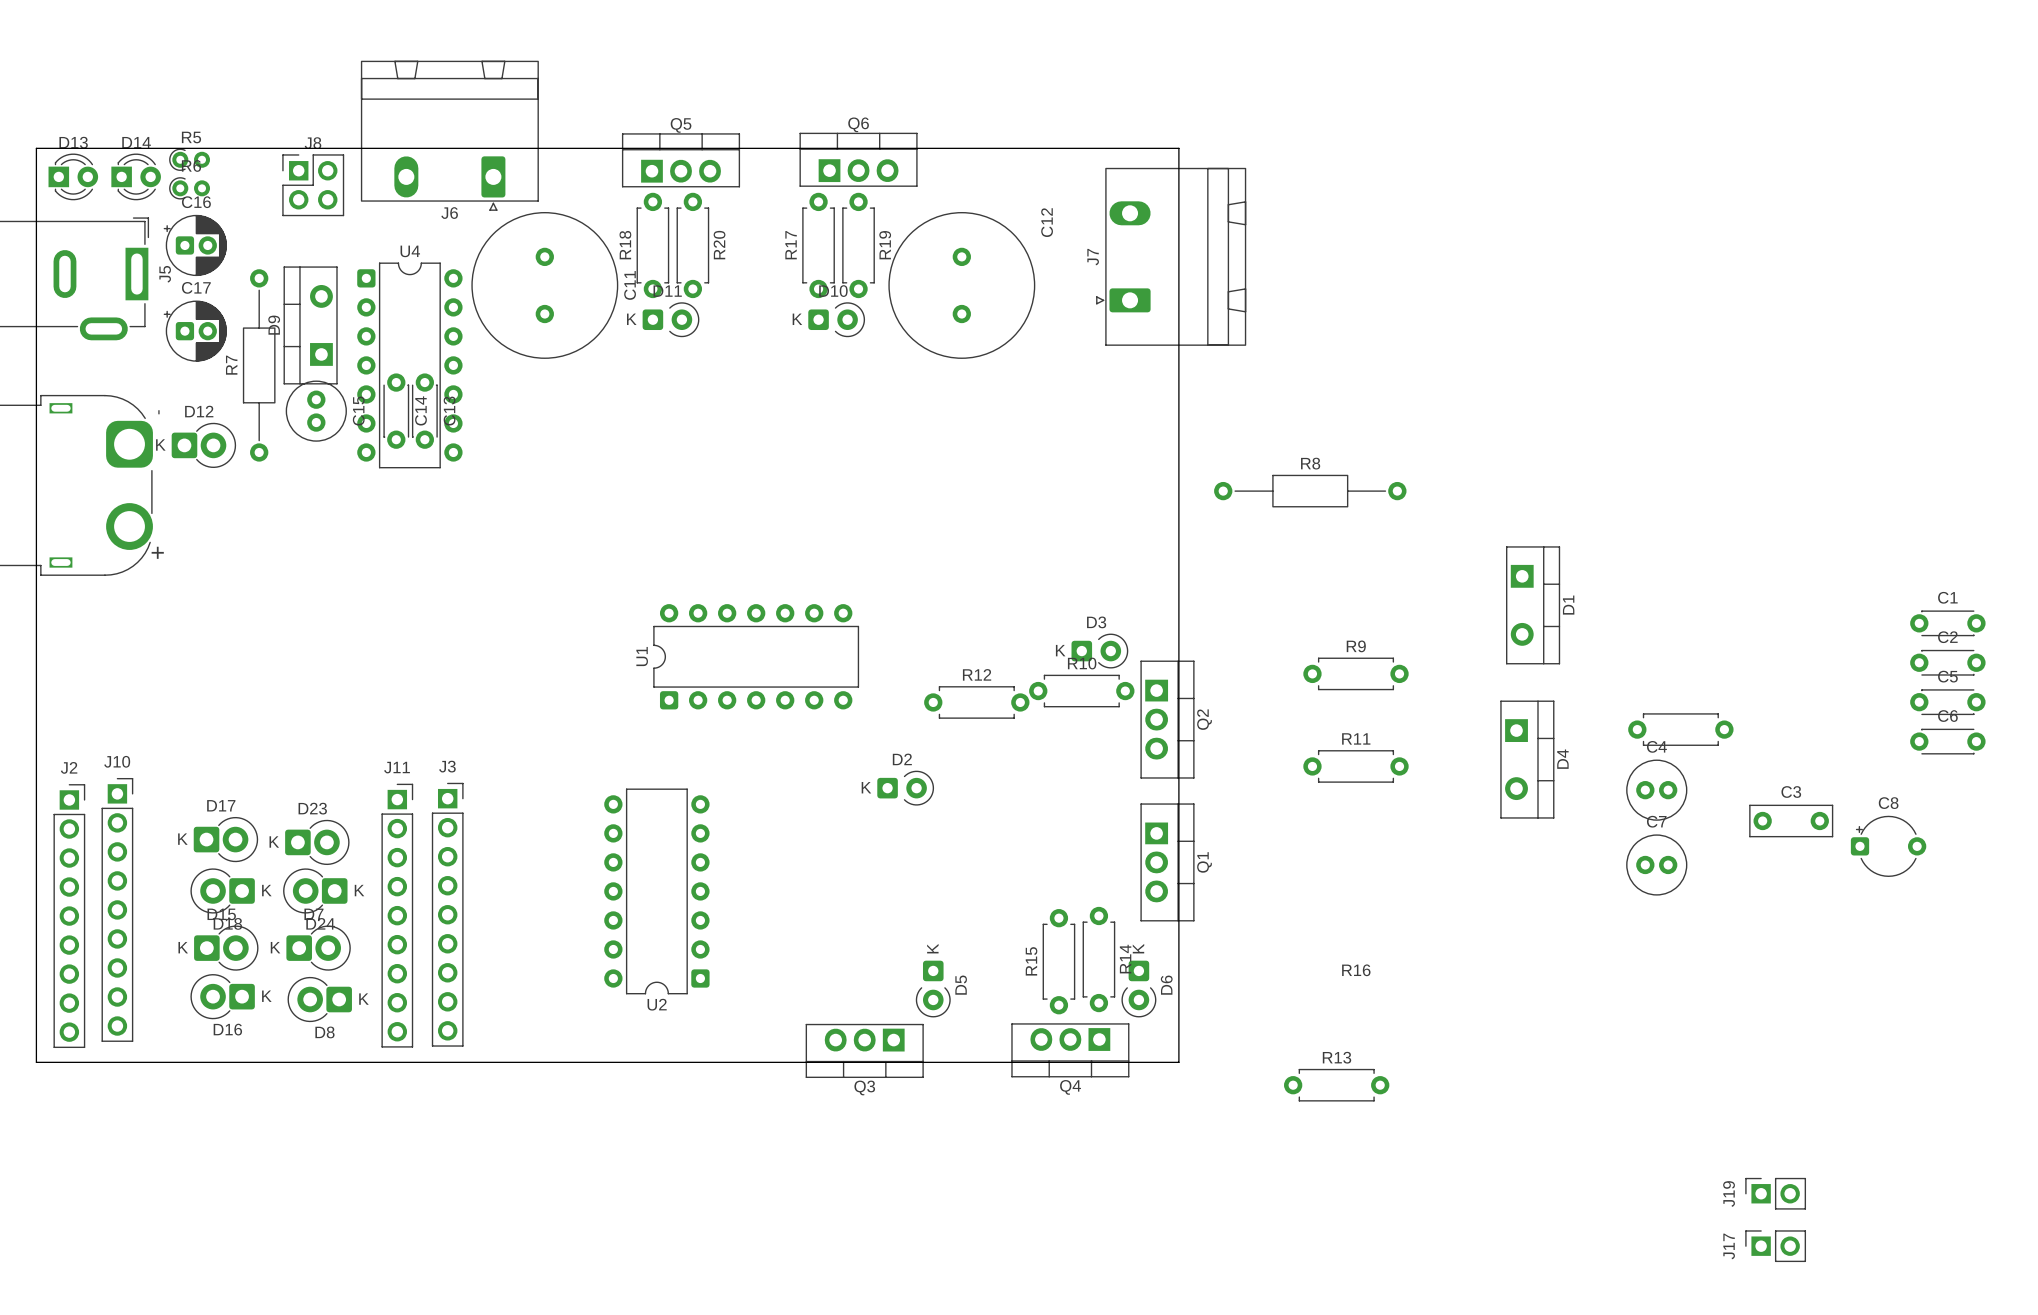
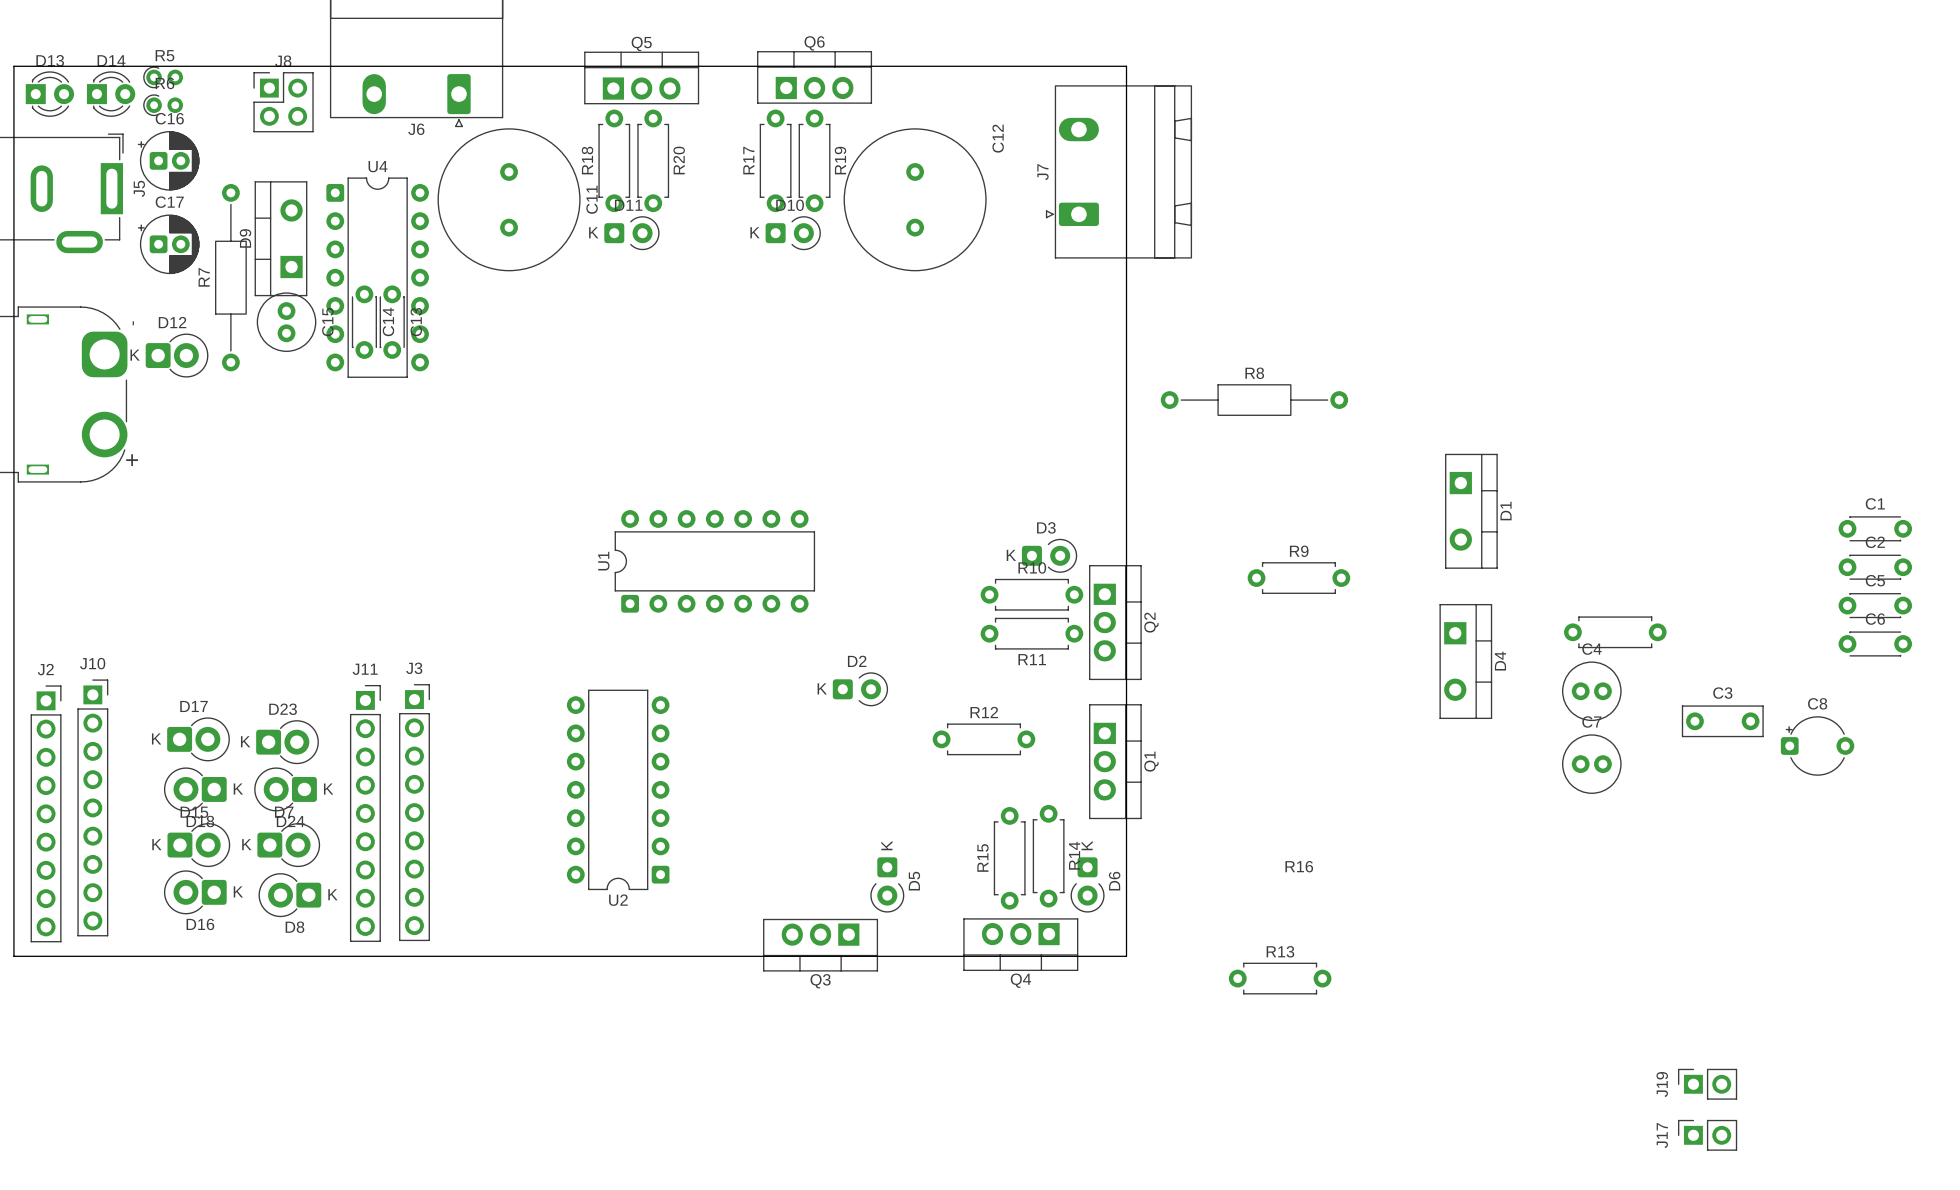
R12 position: (976, 702) -> (983, 739)
R11 name position: R11 (1356, 738) -> R11 (1032, 659)
R11 position: (1355, 766) -> (1031, 633)

